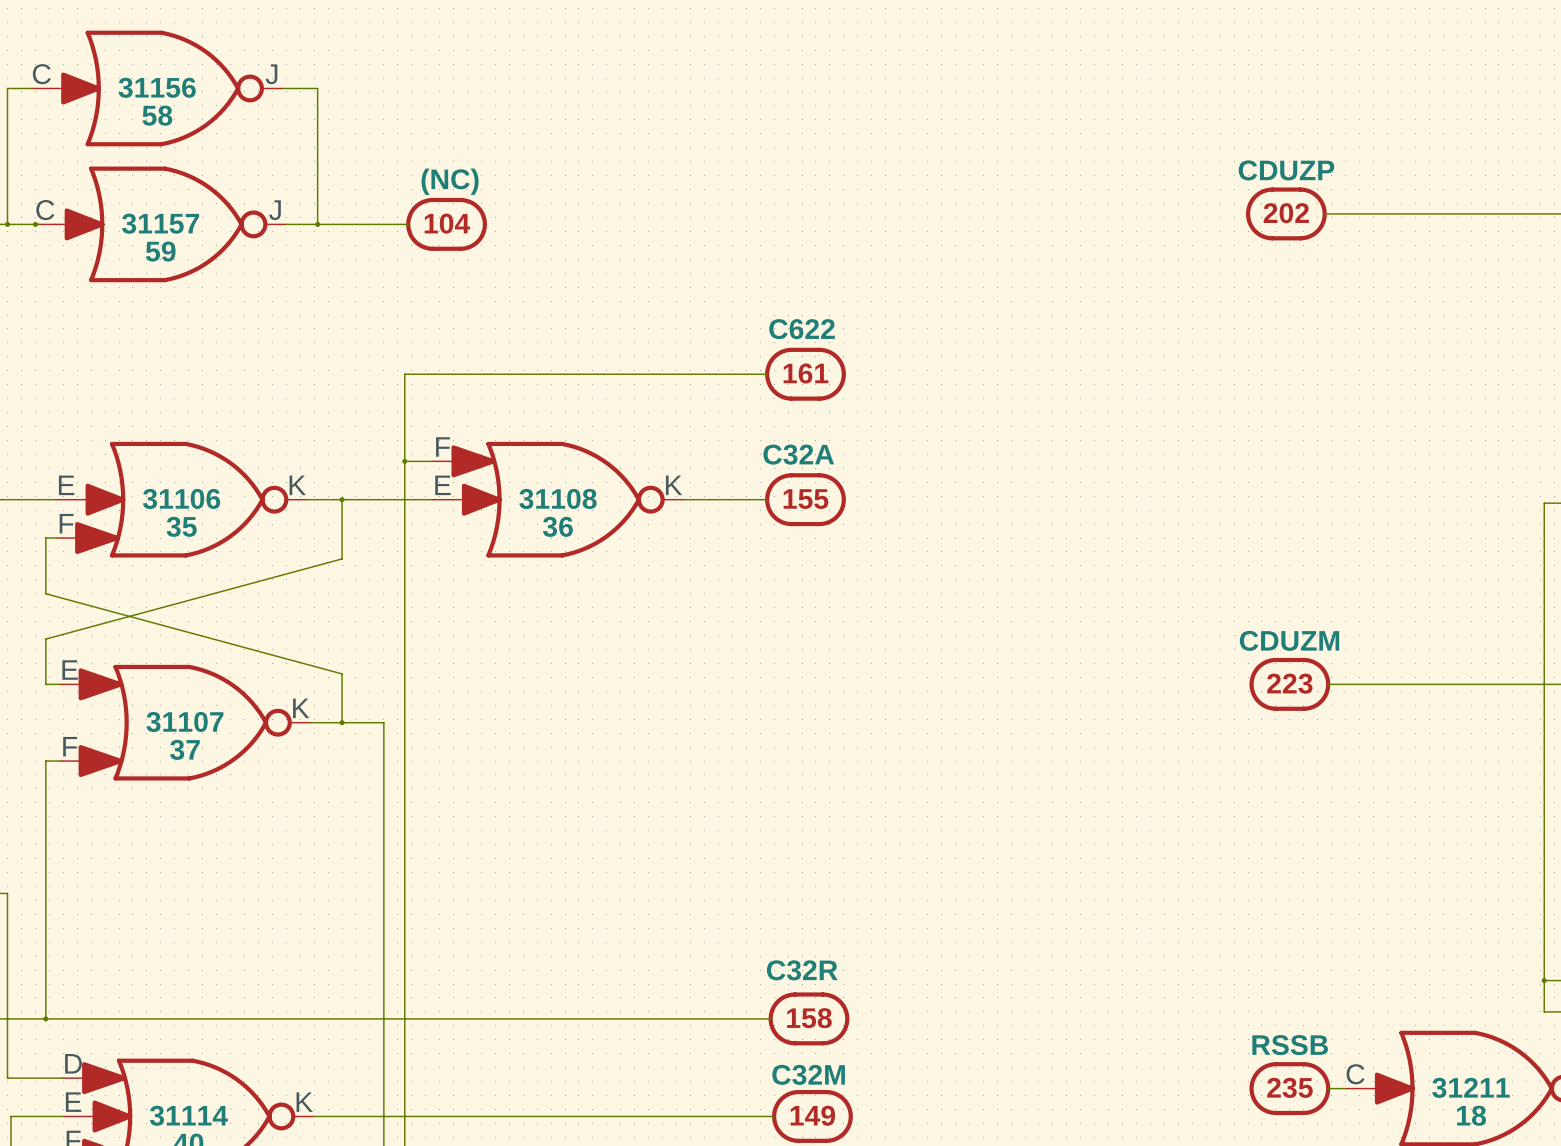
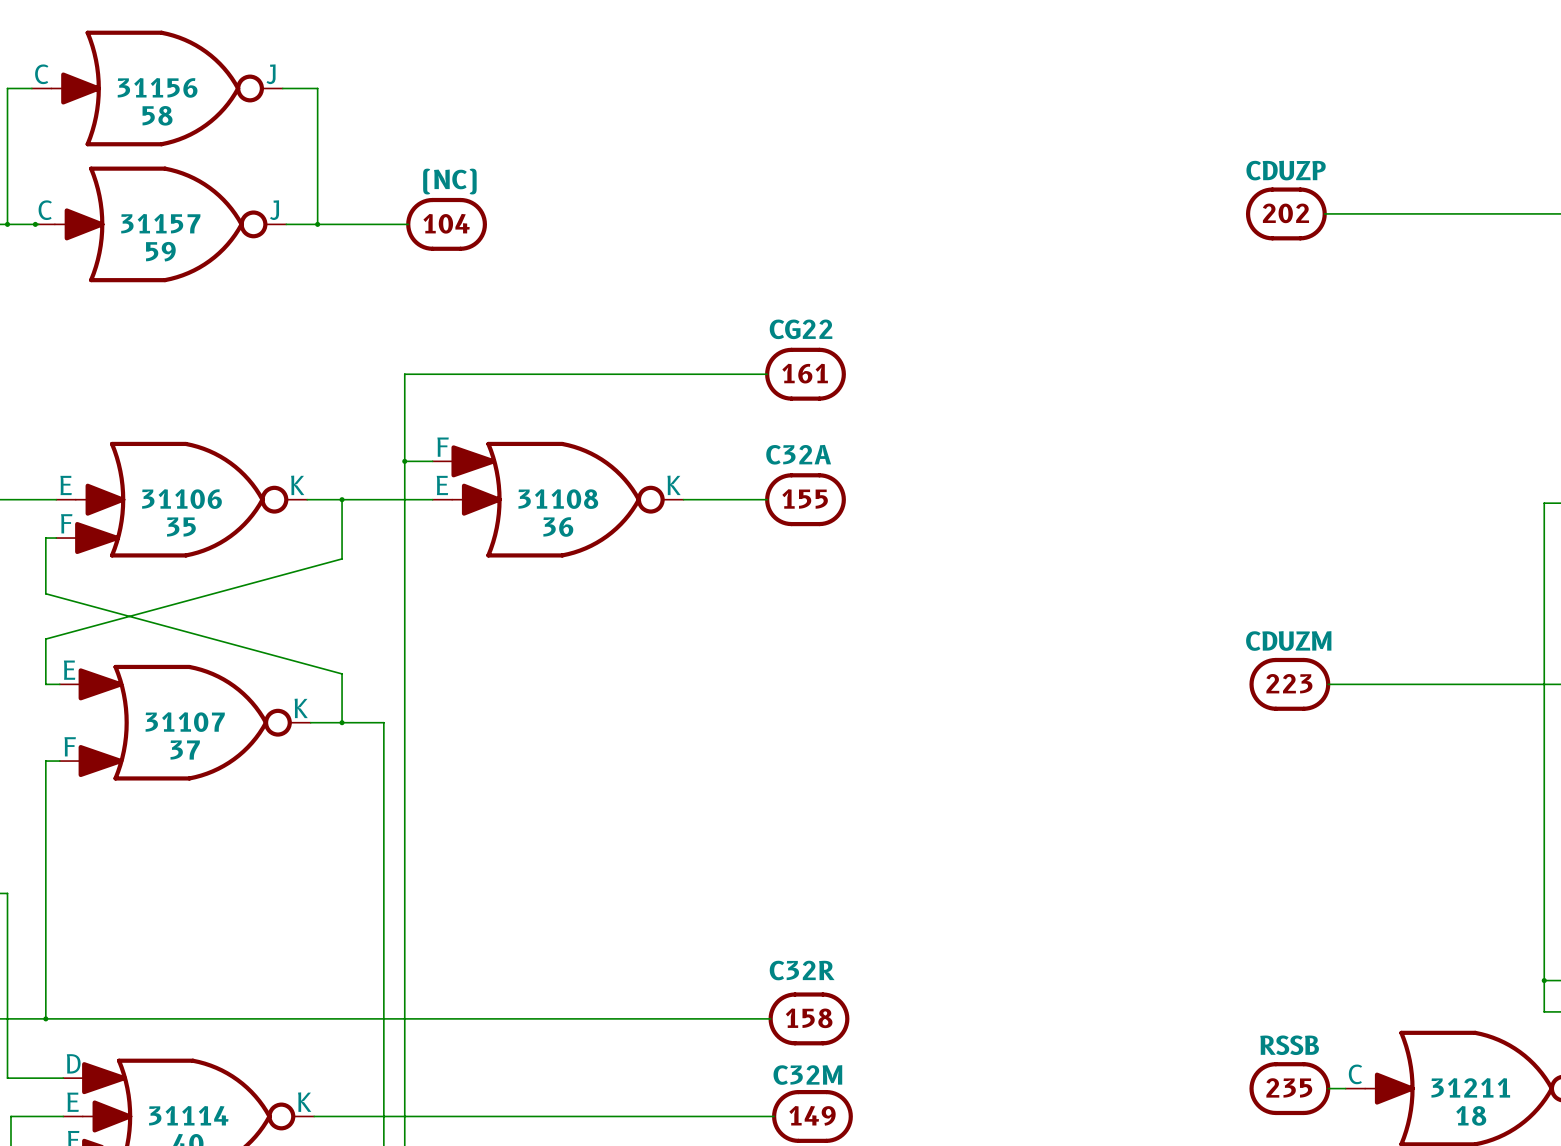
part text: C622 (802, 329) -> CG22 (801, 329)

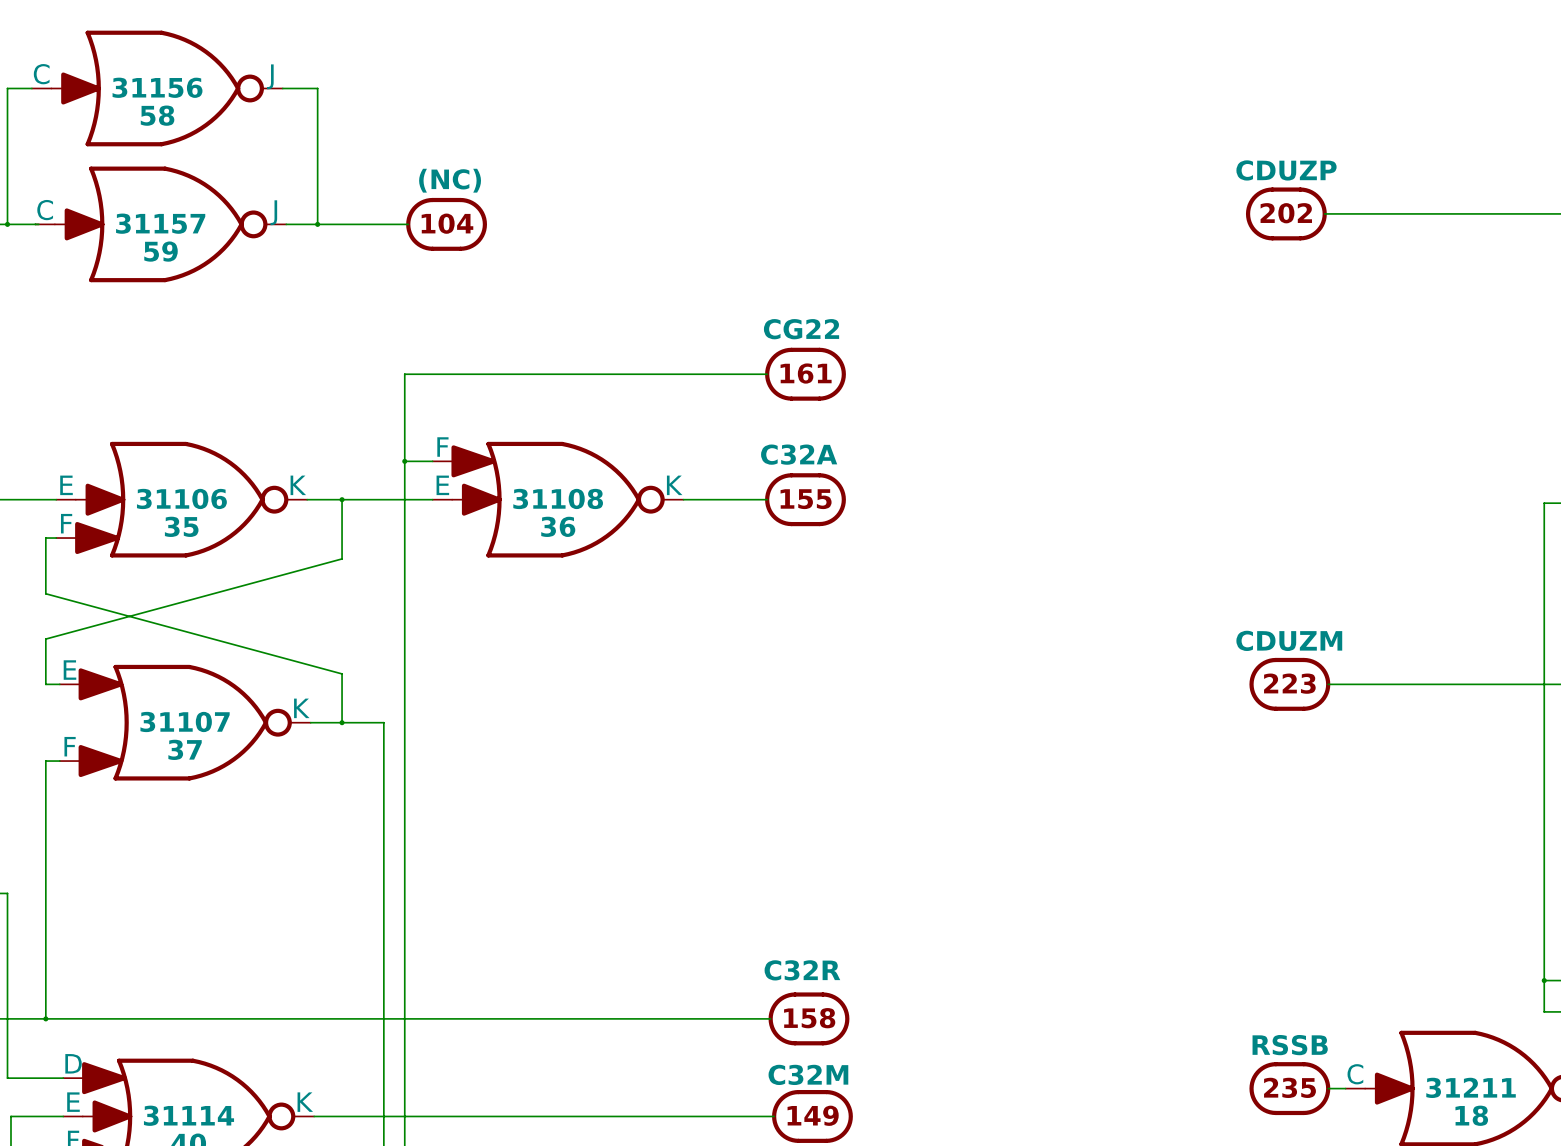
junction: (35, 224) -> none

